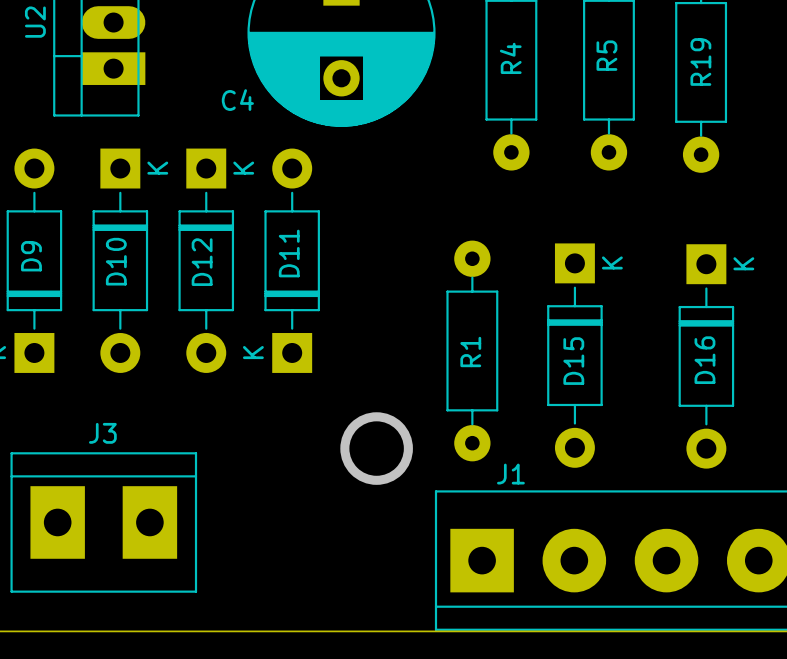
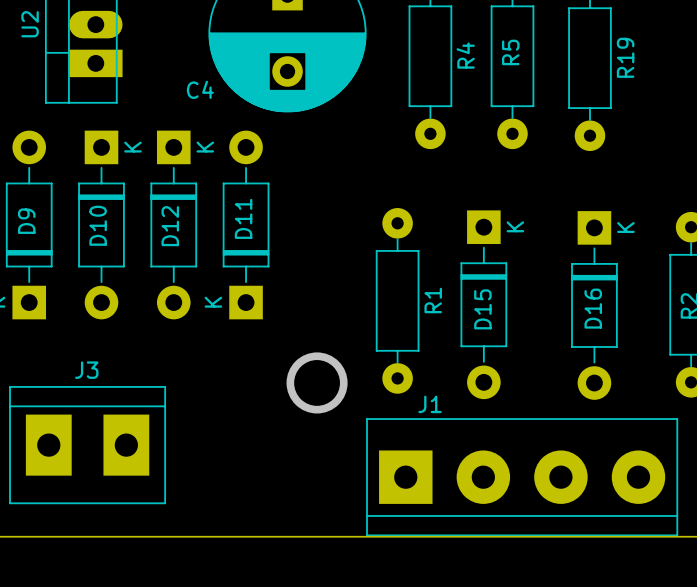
R4 name position: R4 (510, 58) -> R4 (465, 55)
R19 name position: R19 (700, 61) -> R19 (625, 57)
R1 name position: R1 (470, 351) -> R1 (433, 300)

